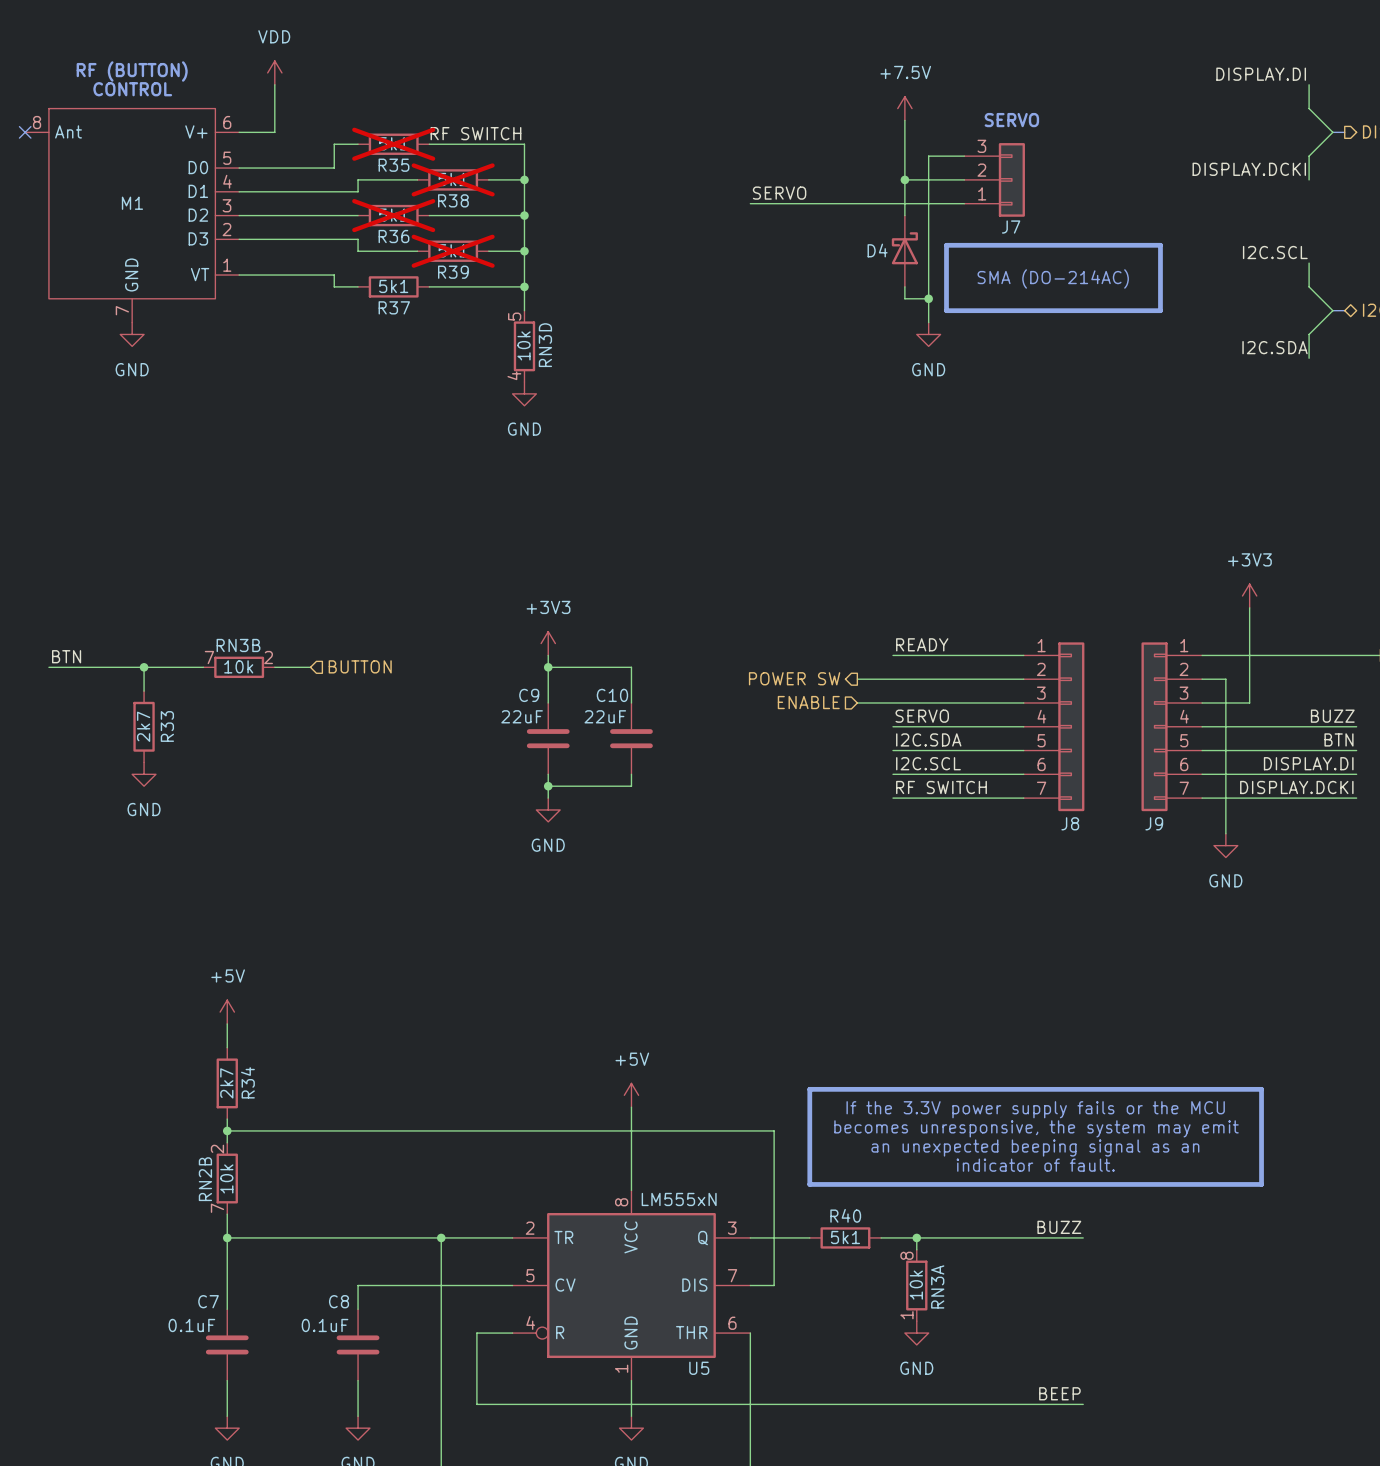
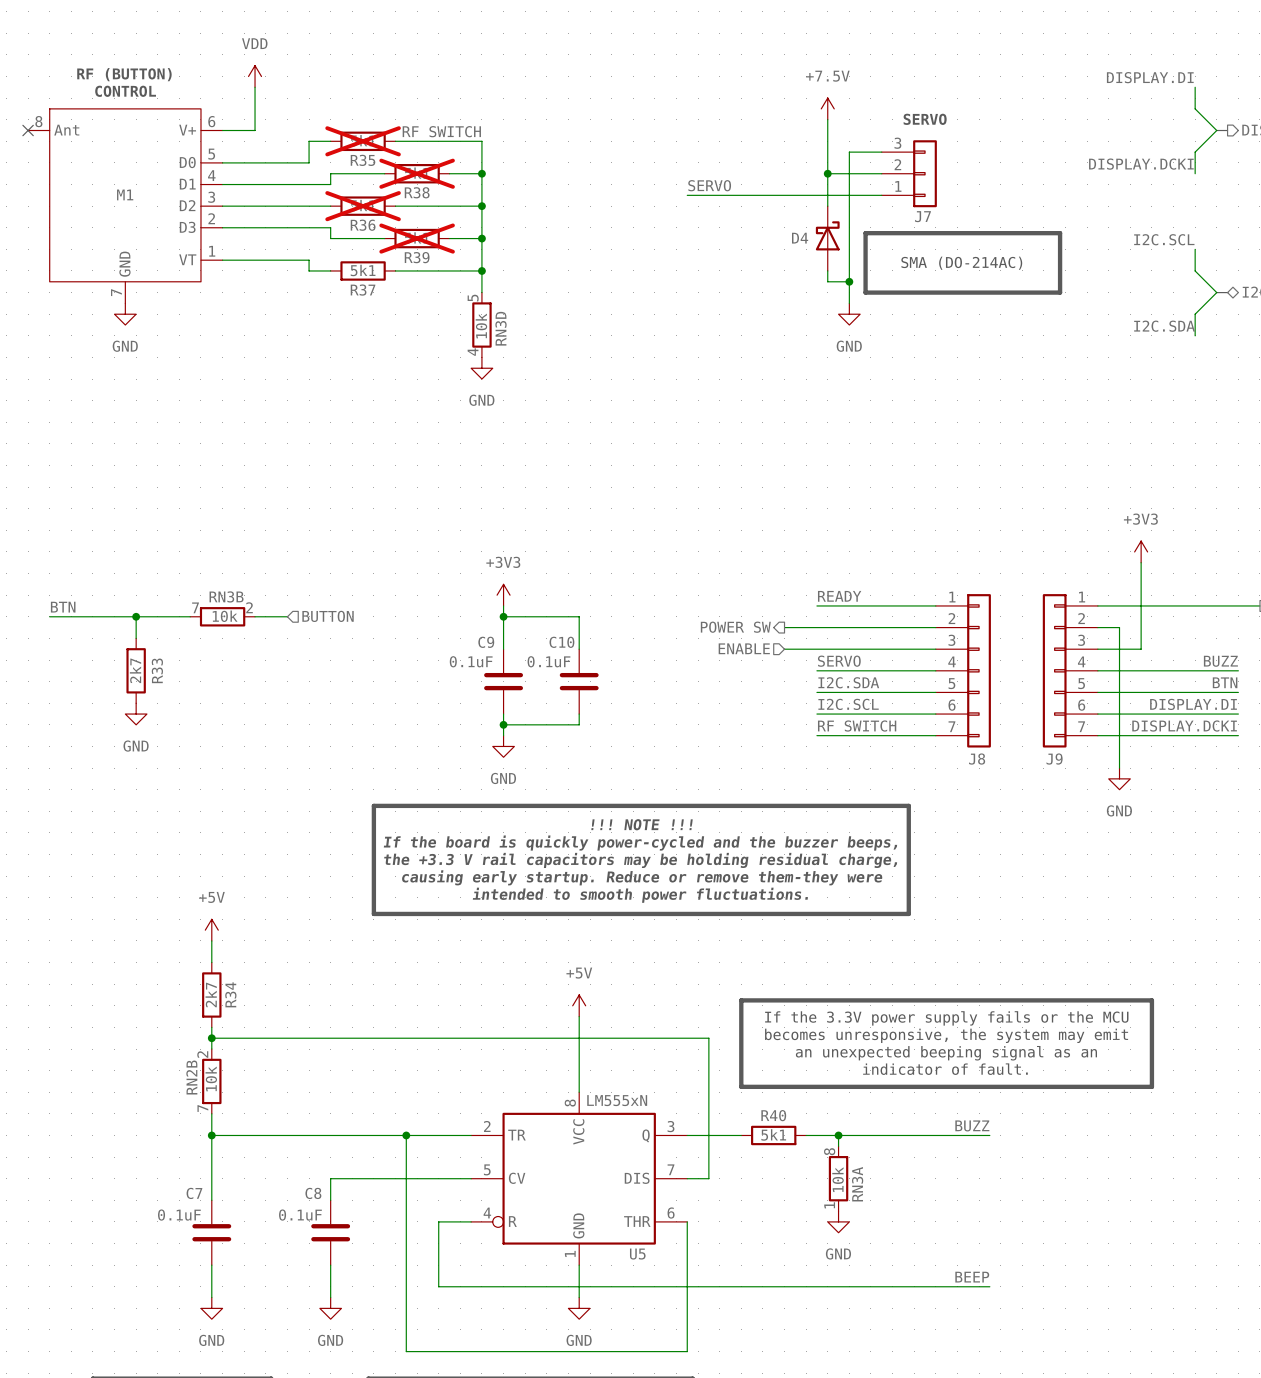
C9 value: 22uF (522, 716) -> 0.1uF (471, 661)
C10 value: 22uF (605, 716) -> 0.1uF (548, 661)
line: none -> (373, 805) (908, 805) (908, 913) (373, 913) (373, 805)
text: none -> !!! NOTE !!! (642, 824)
text: none -> If the board is quickly power-cycled and the buzzer beeps, (640, 843)
text: none -> the +3.3 V rail capacitors may be holding residual charge, (640, 860)
text: none -> causing early startup. Reduce or remove them-they were (642, 877)
text: none -> intended to smooth power fluctuations. (640, 895)

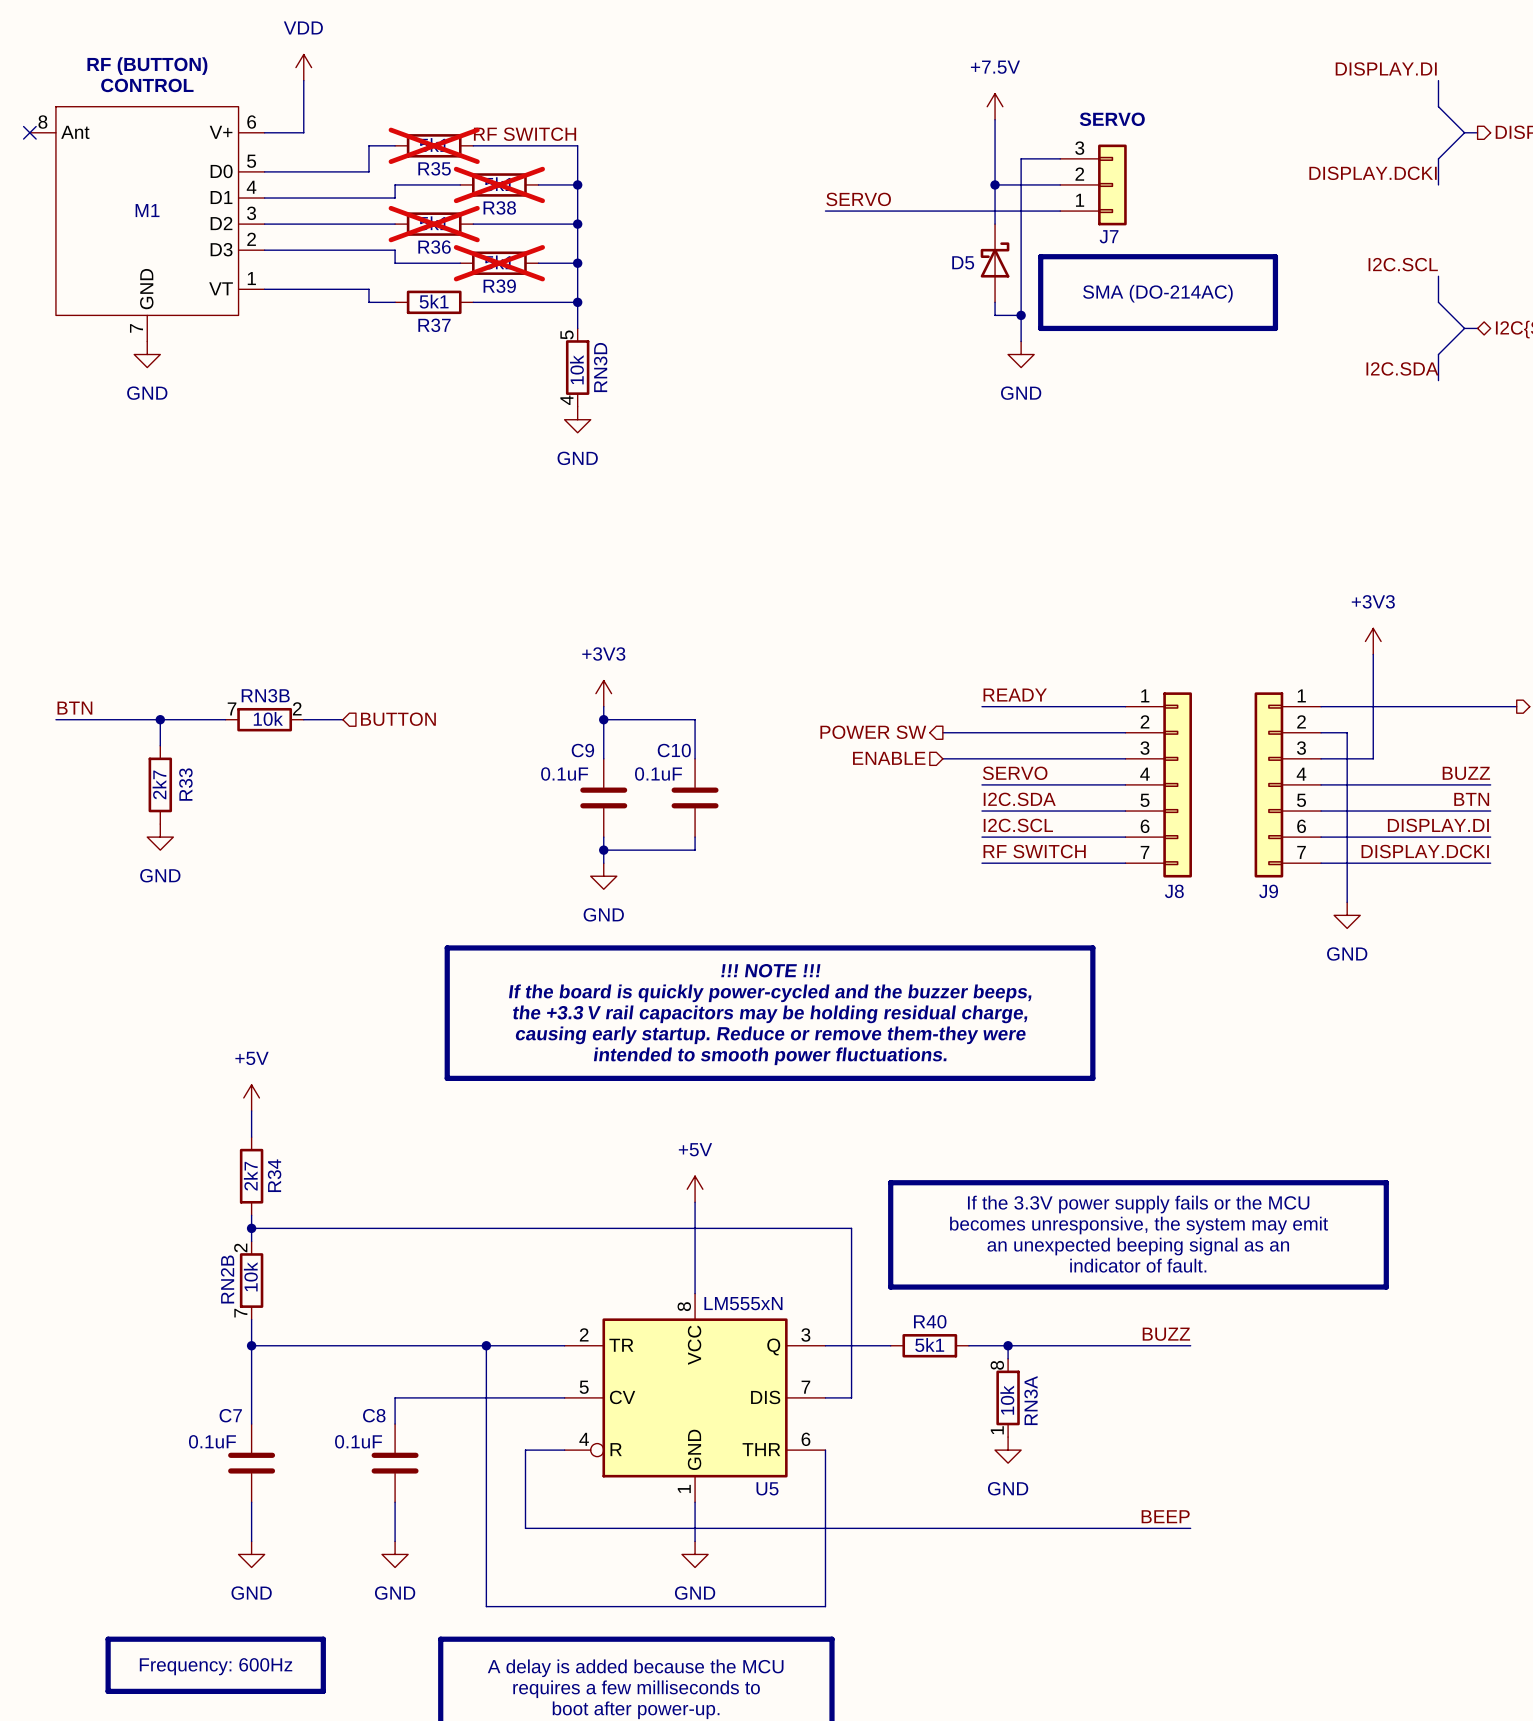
D4 name: D4 (800, 238) -> D5 (963, 262)

